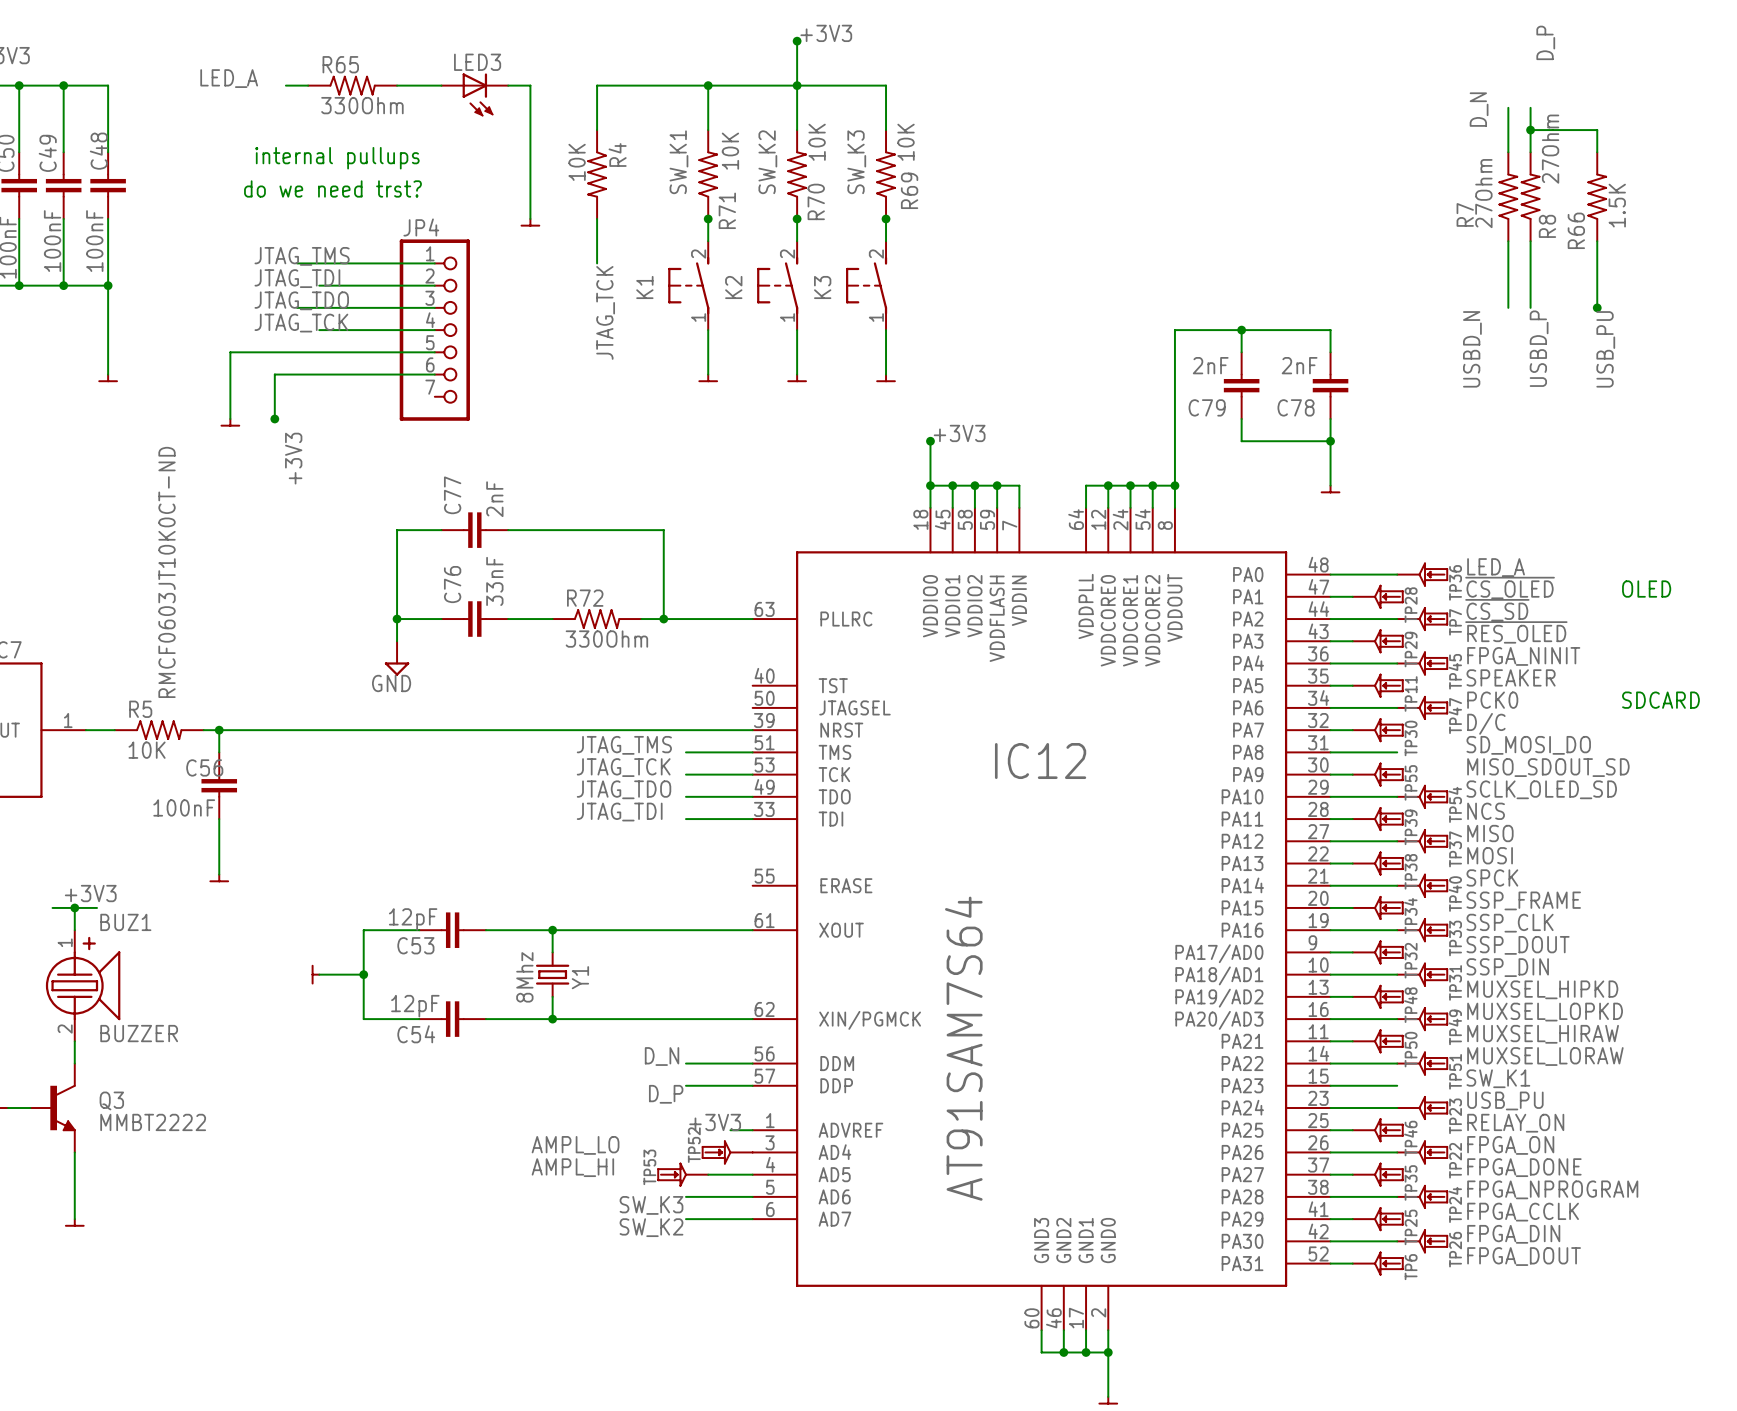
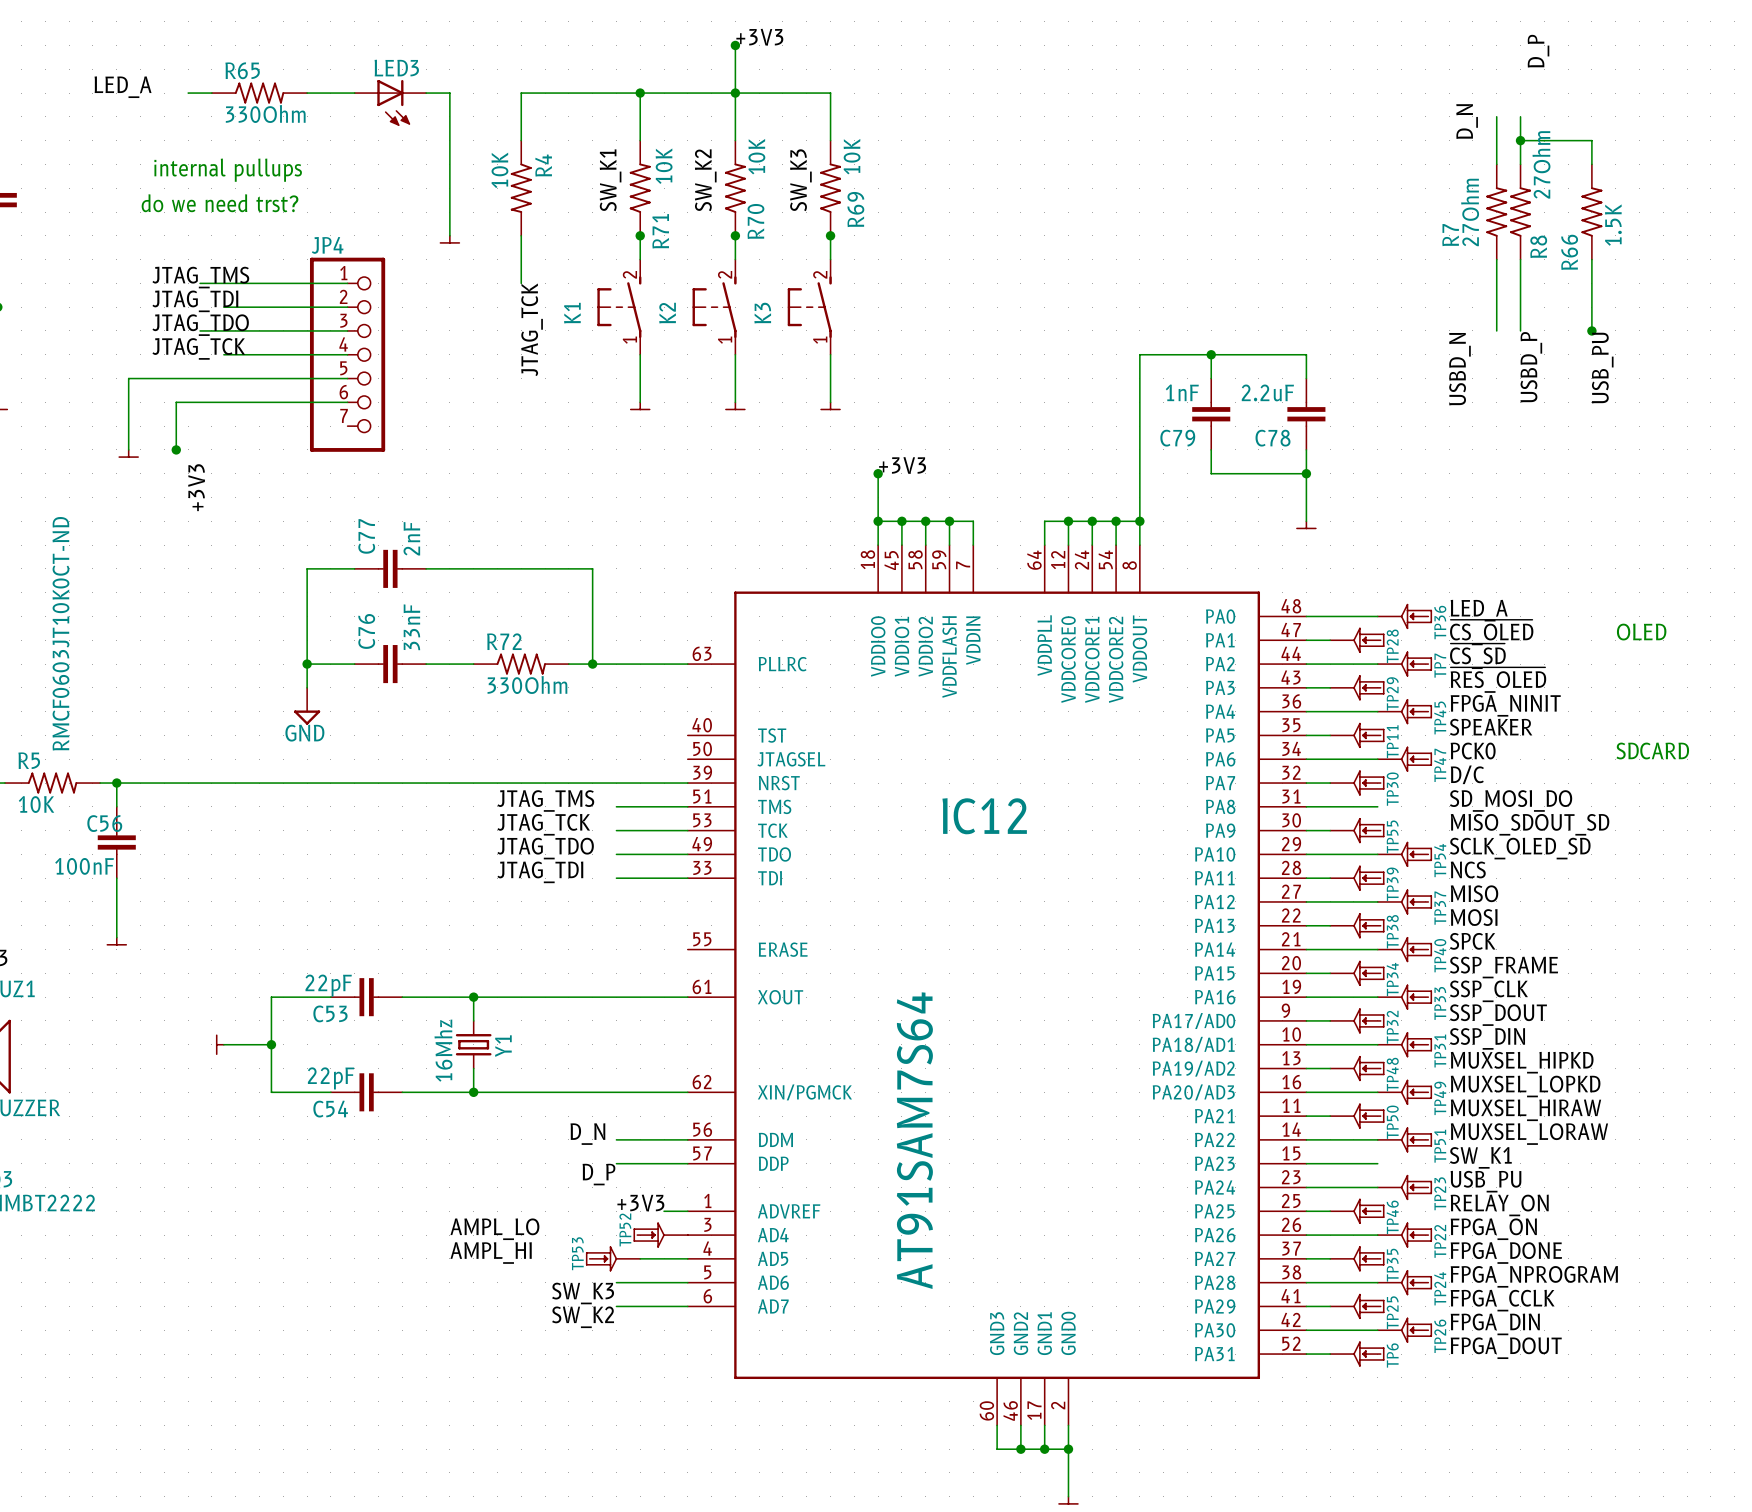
C79 value: 2nF (1210, 365) -> 1nF (1182, 392)
C78 value: 2nF (1299, 365) -> 2.2uF (1267, 392)
C53 value: 12pF (413, 919) -> 22pF (328, 985)
Y1 value: 8Mhz (524, 977) -> 16Mhz (443, 1050)
C54 value: 12pF (415, 1006) -> 22pF (331, 1078)

